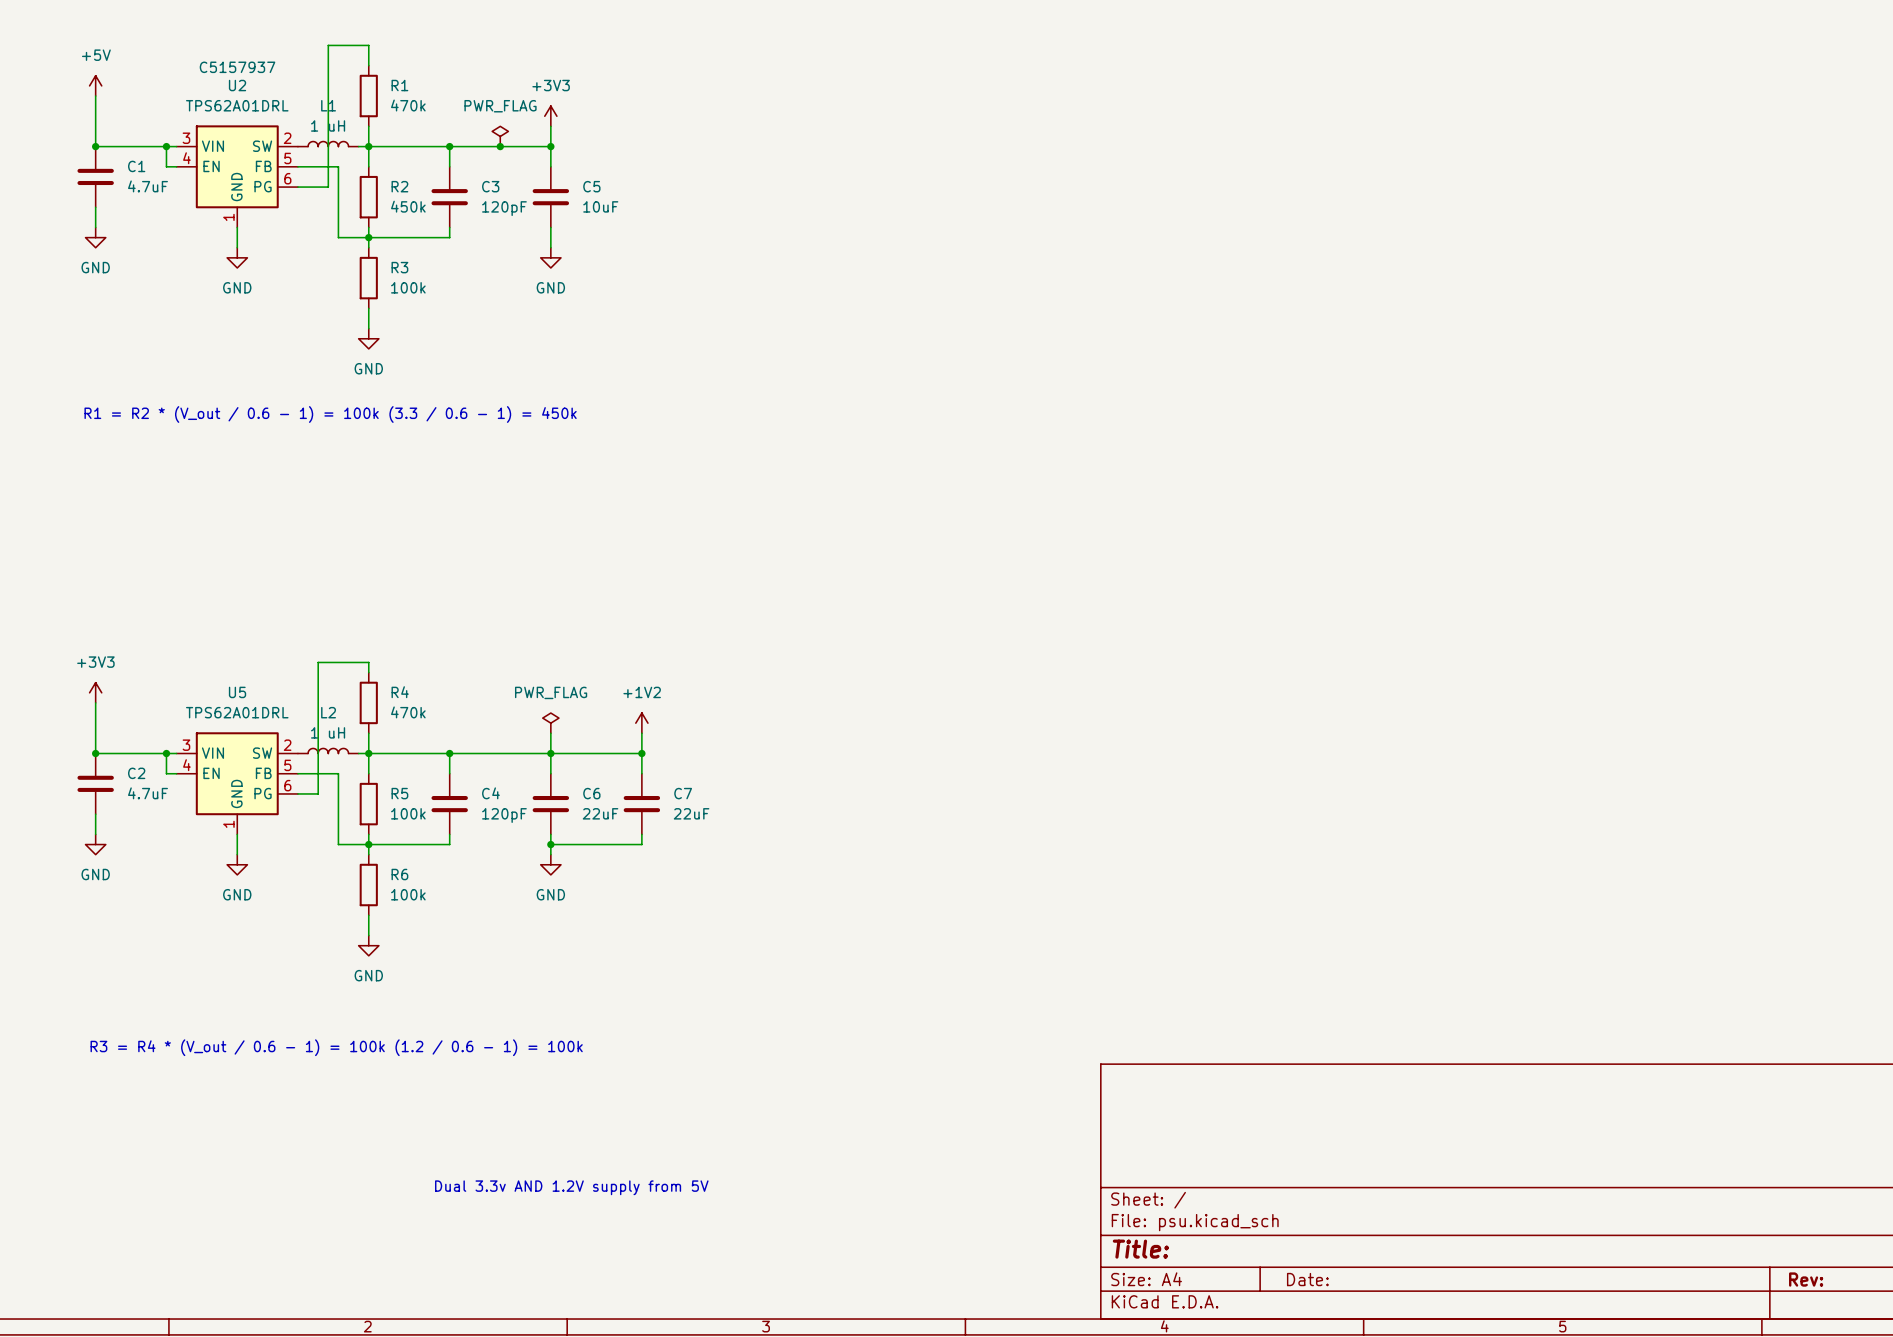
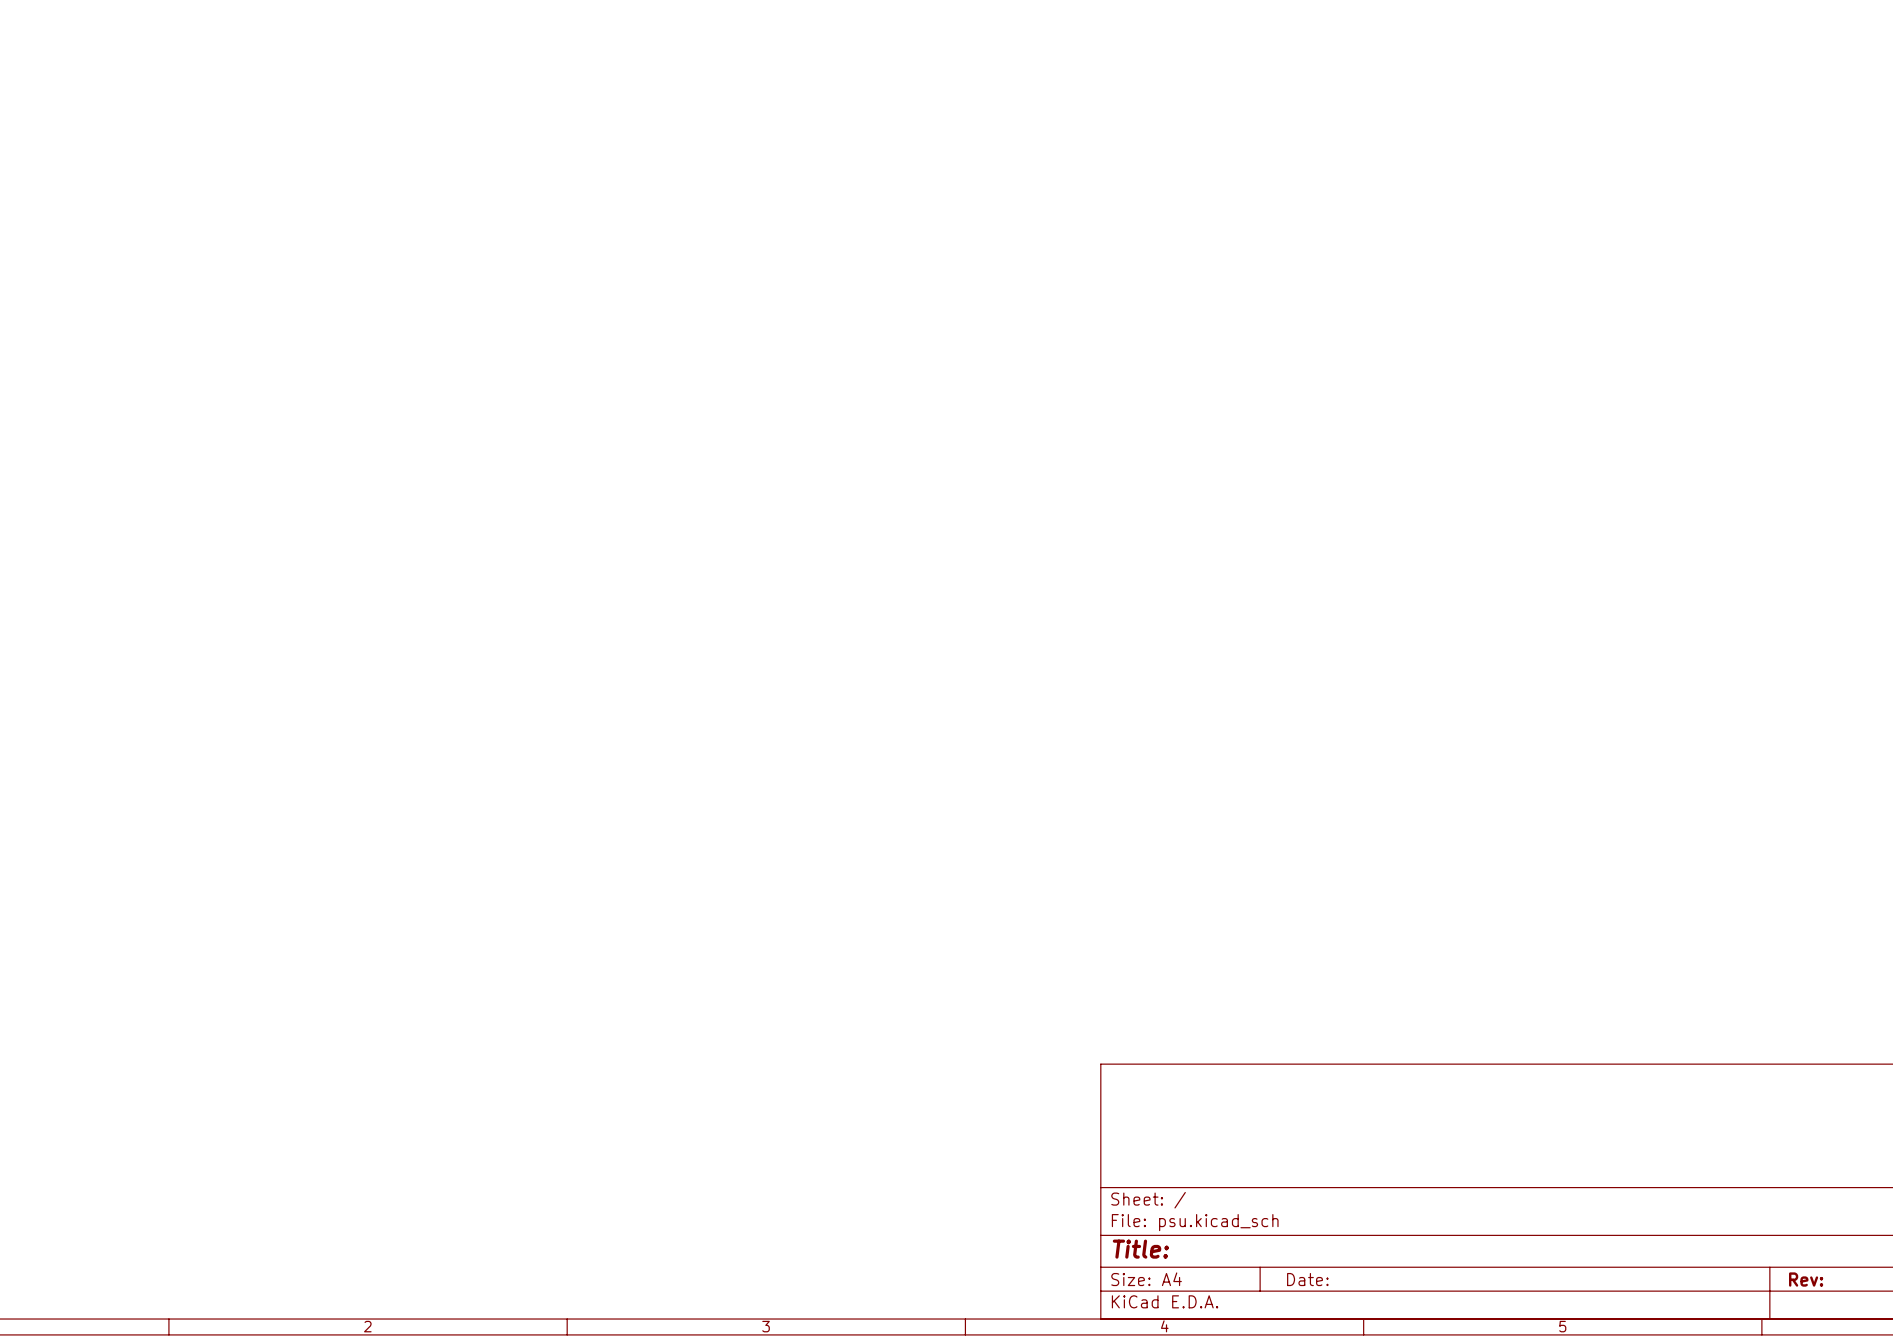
wire: (368, 65) (368, 45) (328, 45) (328, 187) (297, 187) -> none
power symbol: +5V (95, 85) -> none
wire: (95, 96) (95, 146) (176, 146) -> none
R1: 470k (368, 96) -> none
power symbol: +3V3 (550, 116) -> none
wire: (368, 126) (368, 166) -> none
wire: (550, 126) (550, 166) -> none
power symbol: PWR_FLAG (500, 136) -> none
L1: 1 uH (328, 144) -> none
junction: (95, 146) -> none
wire: (166, 146) (166, 166) (176, 166) -> none
junction: (166, 146) -> none
wire: (358, 146) (550, 146) -> none
junction: (368, 146) -> none
wire: (449, 146) (449, 166) -> none
junction: (449, 146) -> none
junction: (500, 146) -> none
junction: (550, 146) -> none
wire: (297, 166) (338, 166) (338, 237) (449, 237) (449, 227) -> none
C1: 4.7uF (95, 176) -> none
U2: TPS62A01DRL (237, 176) -> none
R2: 450k (368, 197) -> none
C3: 120pF (449, 197) -> none
C5: 10uF (550, 197) -> none
wire: (95, 207) (95, 227) -> none
wire: (237, 227) (237, 247) -> none
wire: (368, 227) (368, 247) -> none
wire: (550, 227) (550, 247) -> none
power symbol: GND (95, 237) -> none
junction: (368, 237) -> none
power symbol: GND (237, 257) -> none
power symbol: GND (550, 257) -> none
R3: 100k (368, 278) -> none
wire: (368, 308) (368, 328) -> none
power symbol: GND (368, 338) -> none
text: R1 = R2 * (V_out / 0.6 - 1) = 100k (3.3 / 0.6 - 1) = 450k (330, 414) -> none
wire: (368, 672) (368, 662) (318, 662) (318, 793) (297, 793) -> none
power symbol: +3V3 (95, 692) -> none
wire: (95, 702) (95, 753) (176, 753) -> none
R4: 470k (368, 702) -> none
power symbol: PWR_FLAG (550, 723) -> none
power symbol: +1V2 (641, 723) -> none
wire: (368, 733) (368, 773) -> none
wire: (550, 733) (550, 773) -> none
wire: (641, 733) (641, 773) -> none
L2: 1 uH (328, 750) -> none
junction: (95, 753) -> none
wire: (166, 753) (166, 773) (176, 773) -> none
junction: (166, 753) -> none
wire: (358, 753) (641, 753) -> none
junction: (368, 753) -> none
wire: (449, 753) (449, 773) -> none
junction: (449, 753) -> none
junction: (550, 753) -> none
junction: (641, 753) -> none
wire: (297, 773) (338, 773) (338, 844) (449, 844) (449, 834) -> none
C2: 4.7uF (95, 783) -> none
U5: TPS62A01DRL (237, 783) -> none
R5: 100k (368, 804) -> none
C4: 120pF (449, 804) -> none
C6: 22uF (550, 804) -> none
C7: 22uF (641, 804) -> none
wire: (95, 814) (95, 834) -> none
wire: (237, 834) (237, 854) -> none
wire: (368, 834) (368, 854) -> none
wire: (550, 834) (550, 854) -> none
wire: (641, 834) (641, 844) (550, 844) -> none
power symbol: GND (95, 844) -> none
junction: (368, 844) -> none
junction: (550, 844) -> none
power symbol: GND (237, 864) -> none
power symbol: GND (550, 864) -> none
R6: 100k (368, 885) -> none
wire: (368, 915) (368, 935) -> none
power symbol: GND (368, 945) -> none
text: R3 = R4 * (V_out / 0.6 - 1) = 100k (1.2 / 0.6 - 1) = 100k (336, 1047) -> none
text: Dual 3.3v AND 1.2V supply from 5V (571, 1187) -> none

